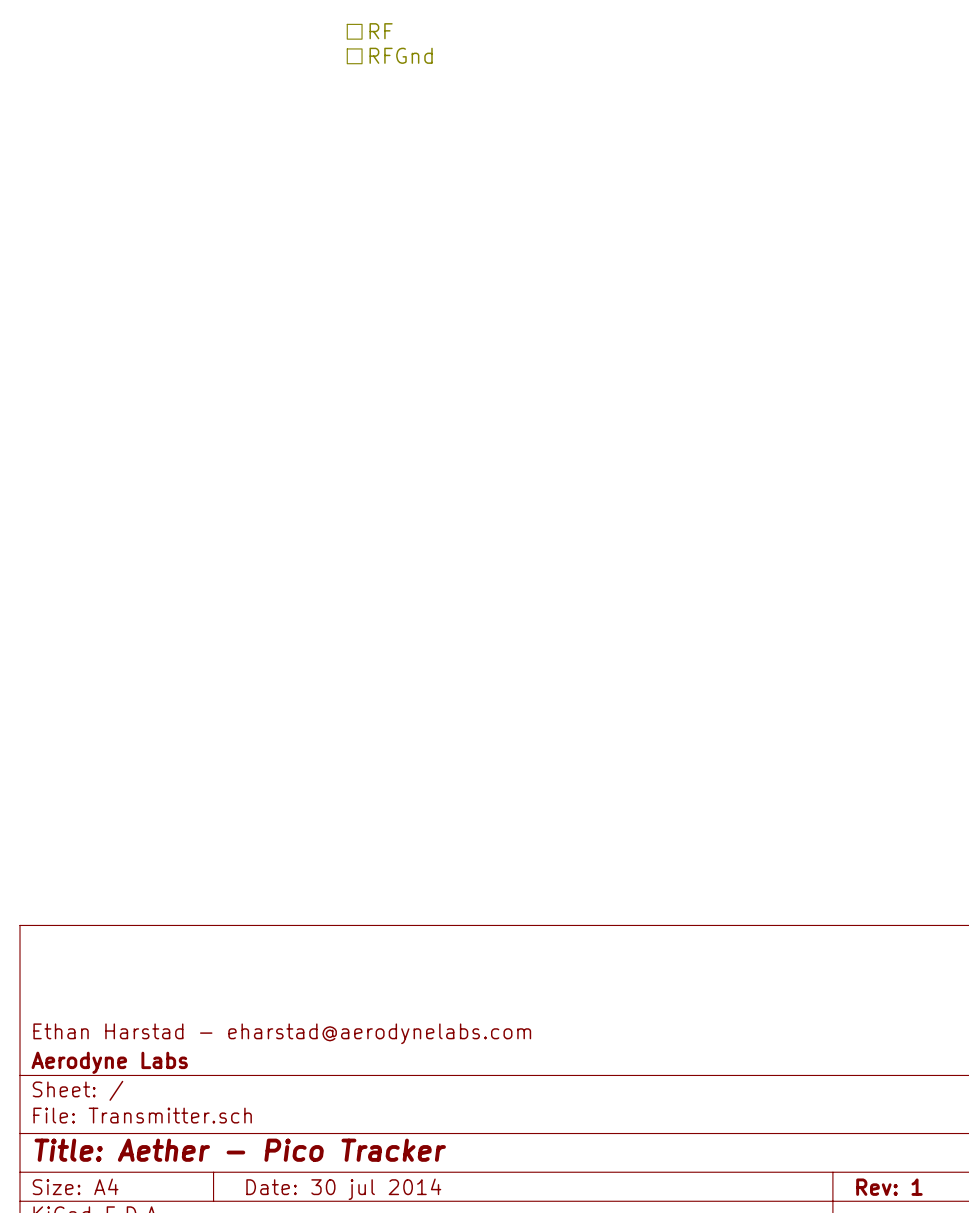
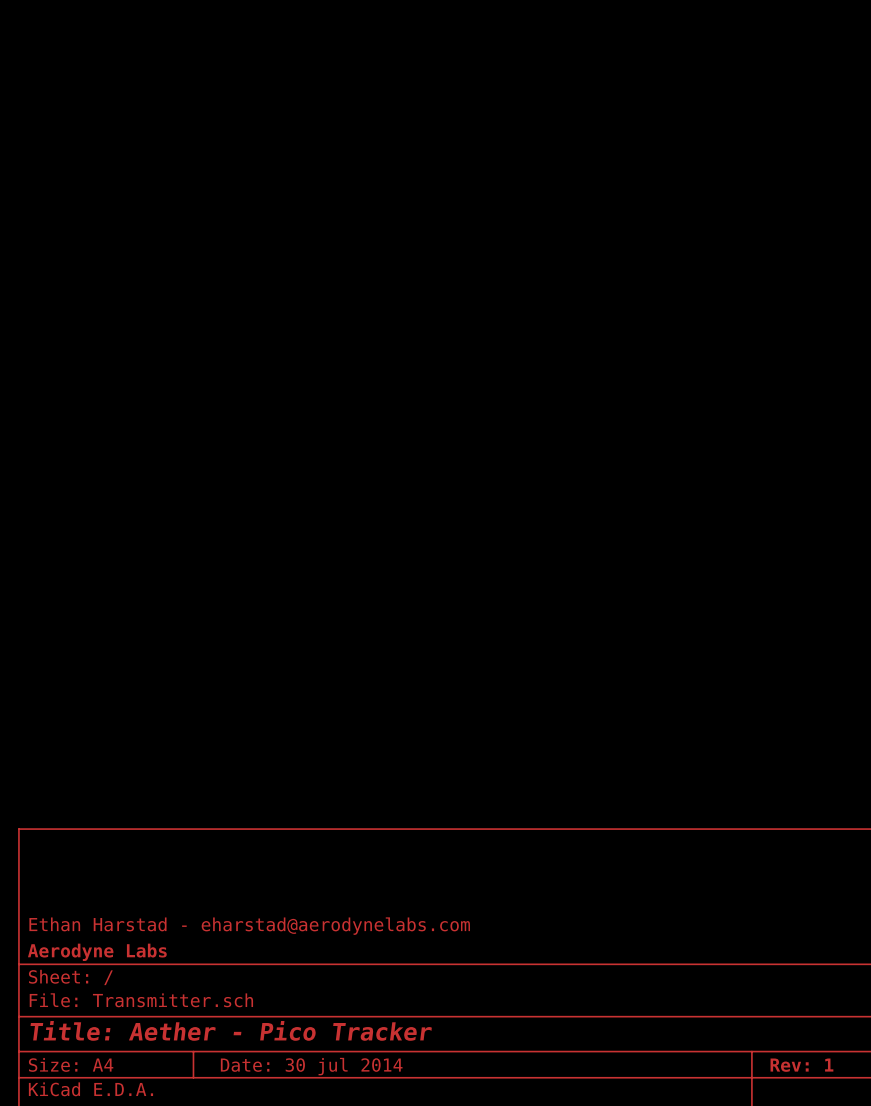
hierarchical label: RF (381, 31) -> none
hierarchical label: RFGnd (401, 55) -> none

